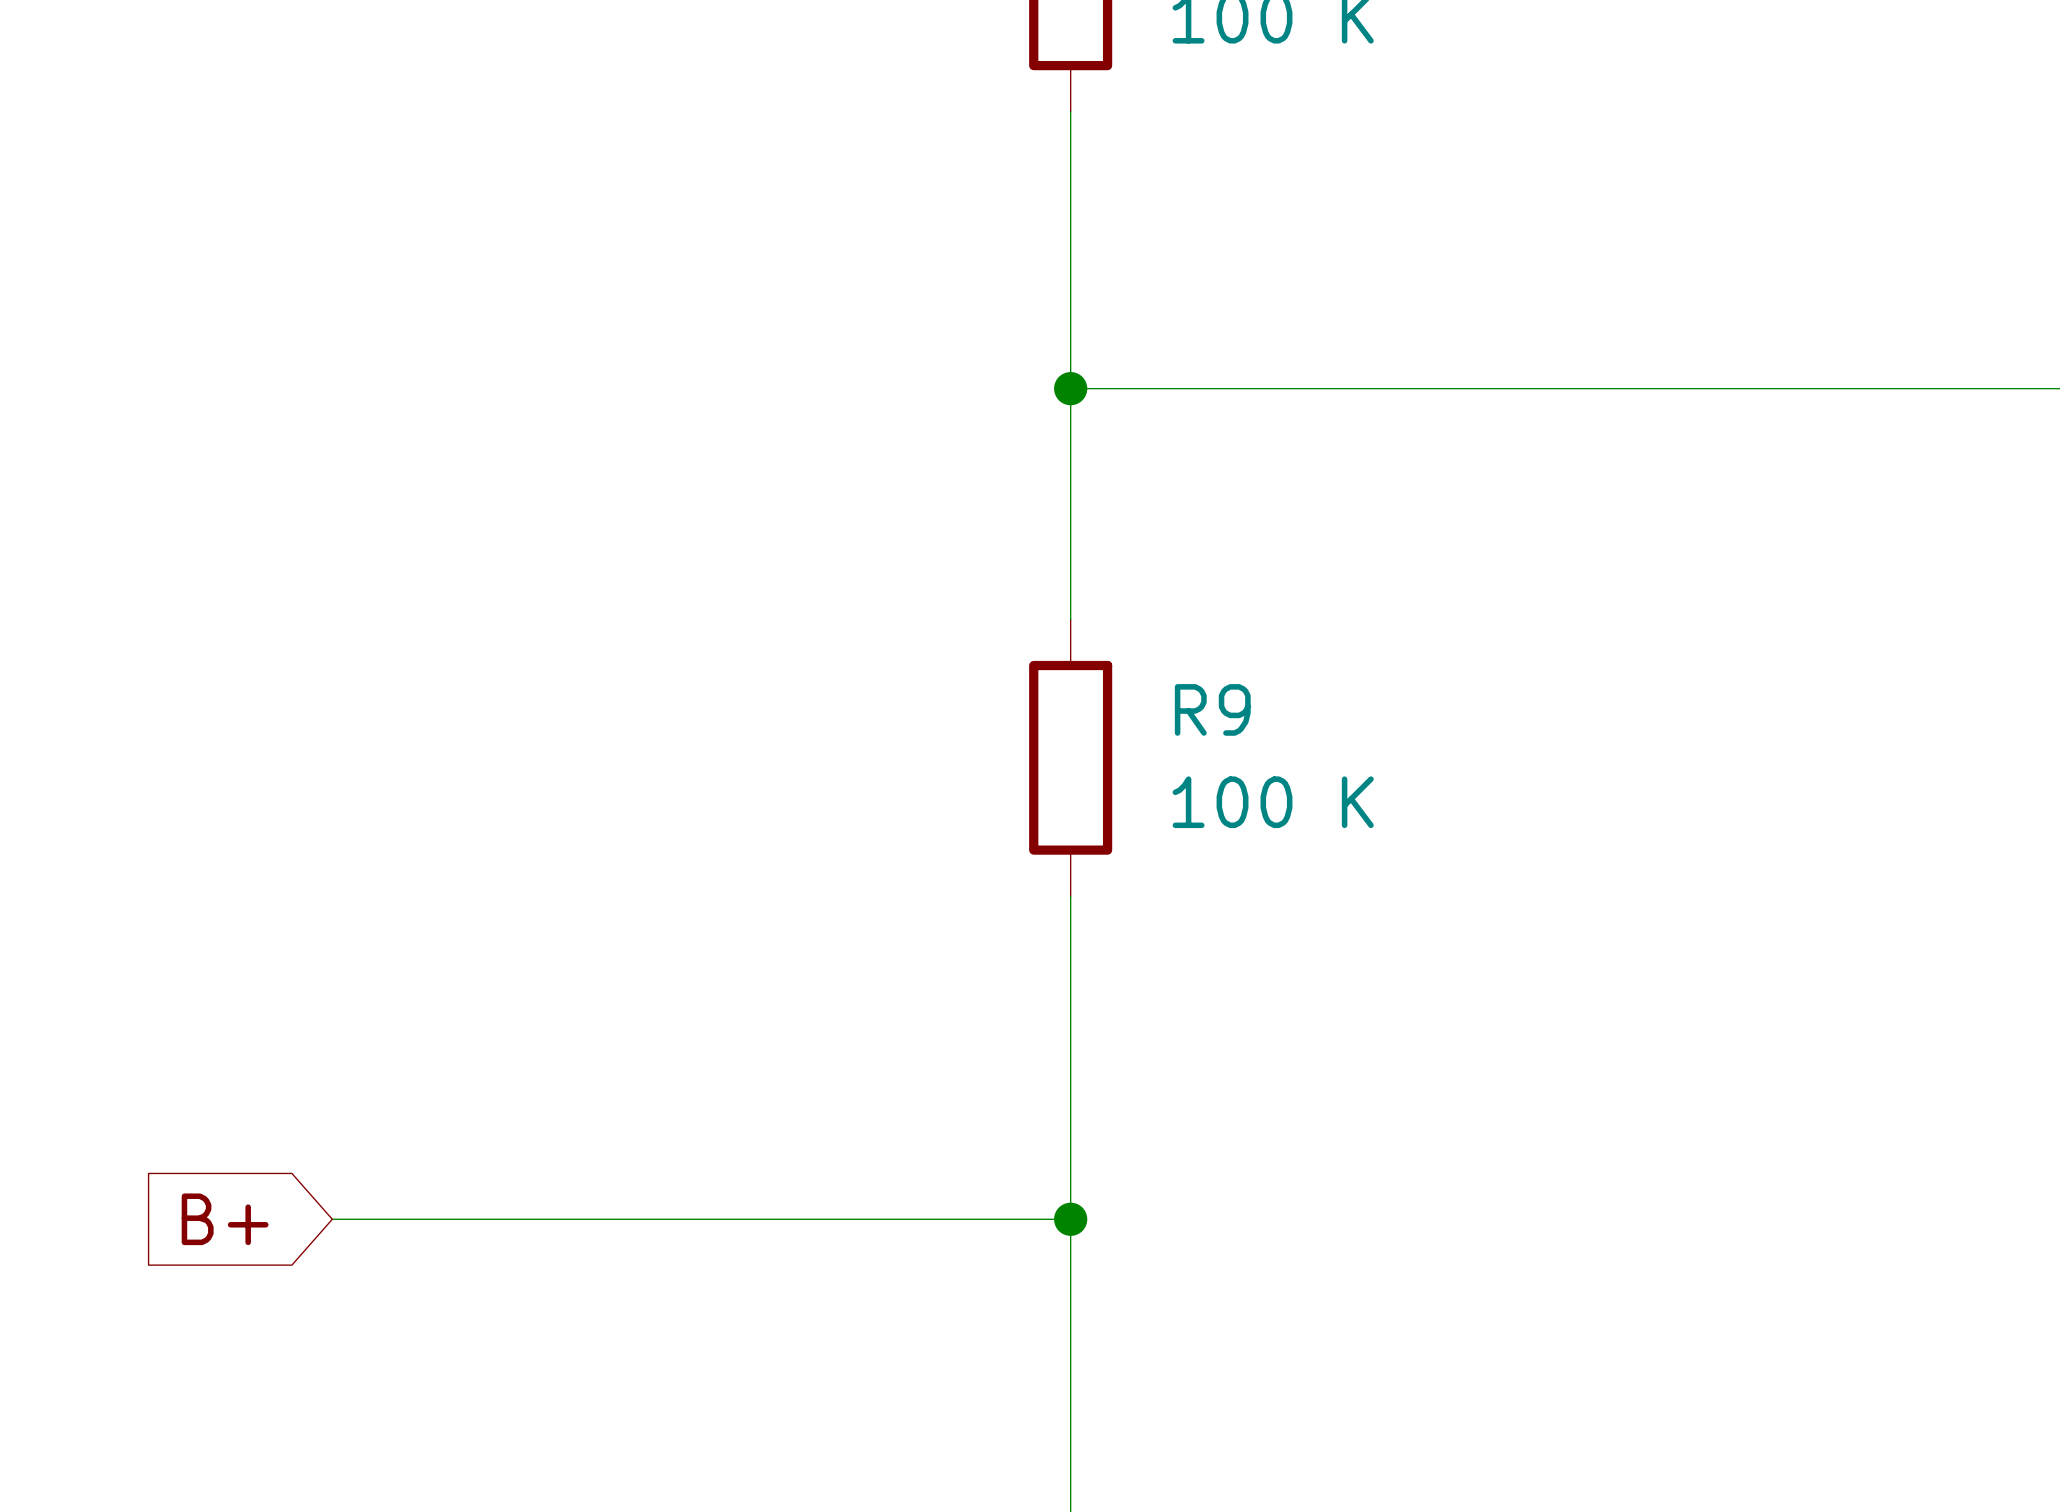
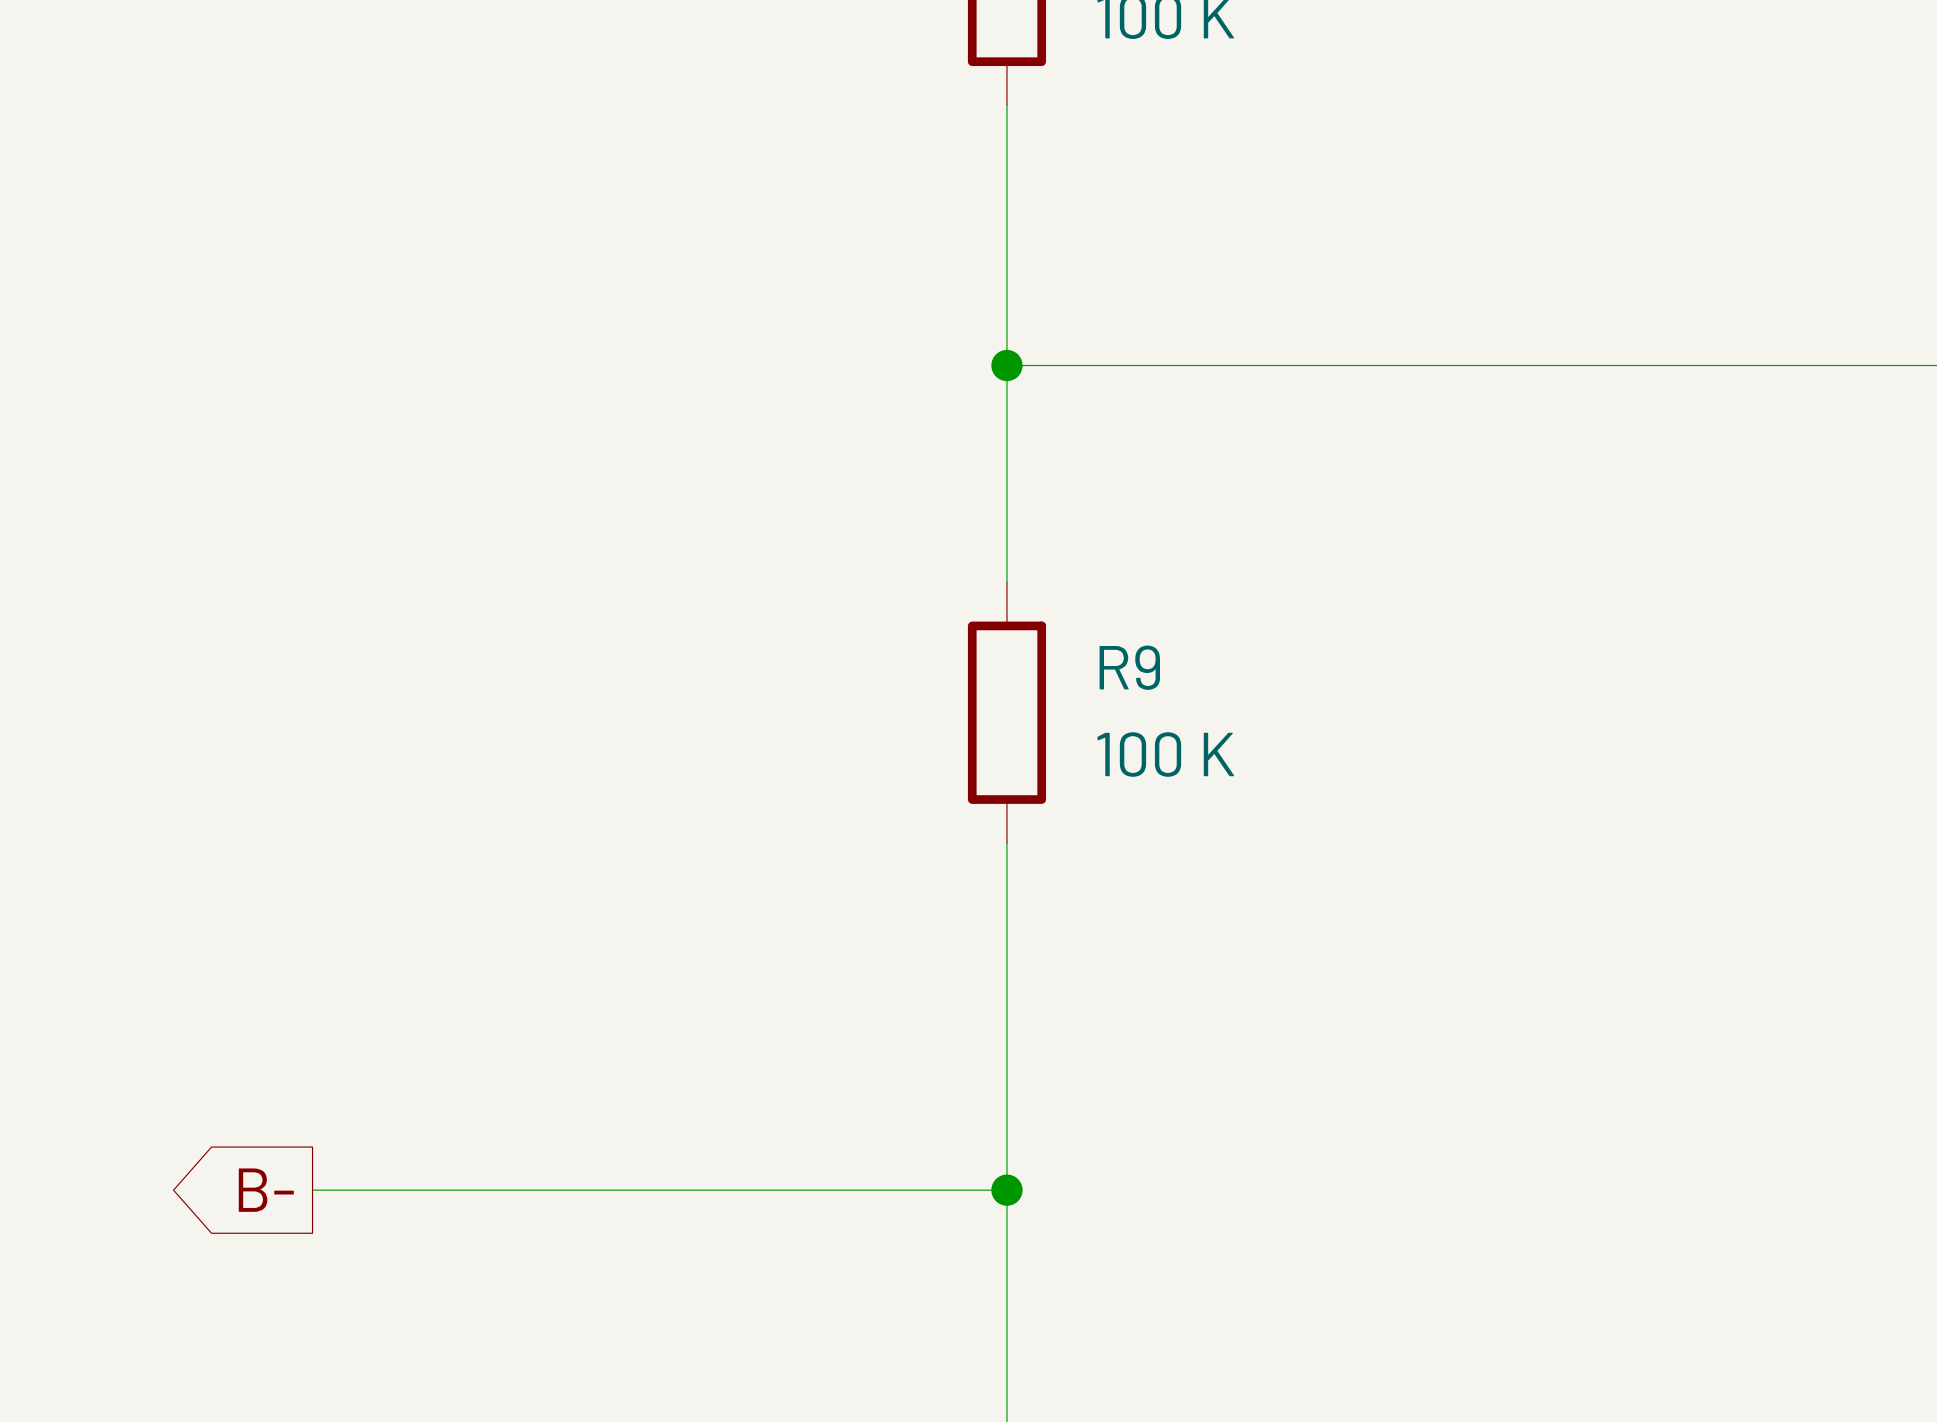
global label: B+ (225, 1219) -> none
wire: (332, 1219) (1070, 1219) -> (312, 1190) (1006, 1190)
junction position: (1070, 1219) -> (1006, 1190)
global label: none -> B- (266, 1190)

